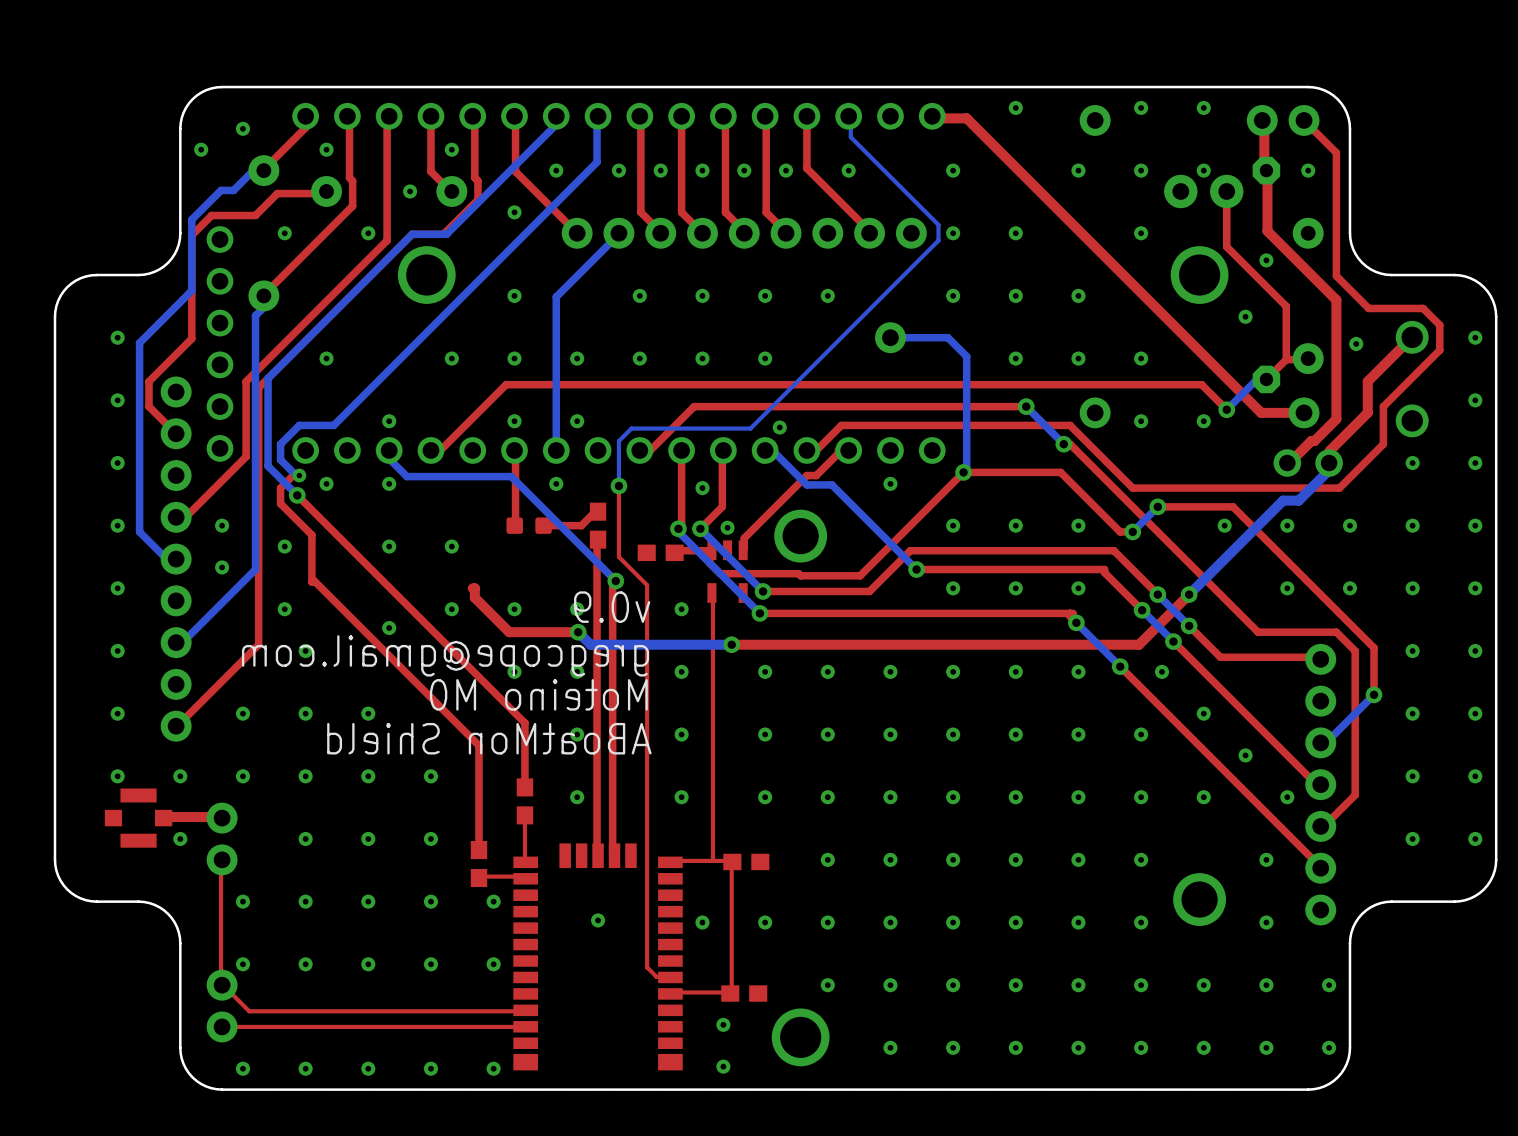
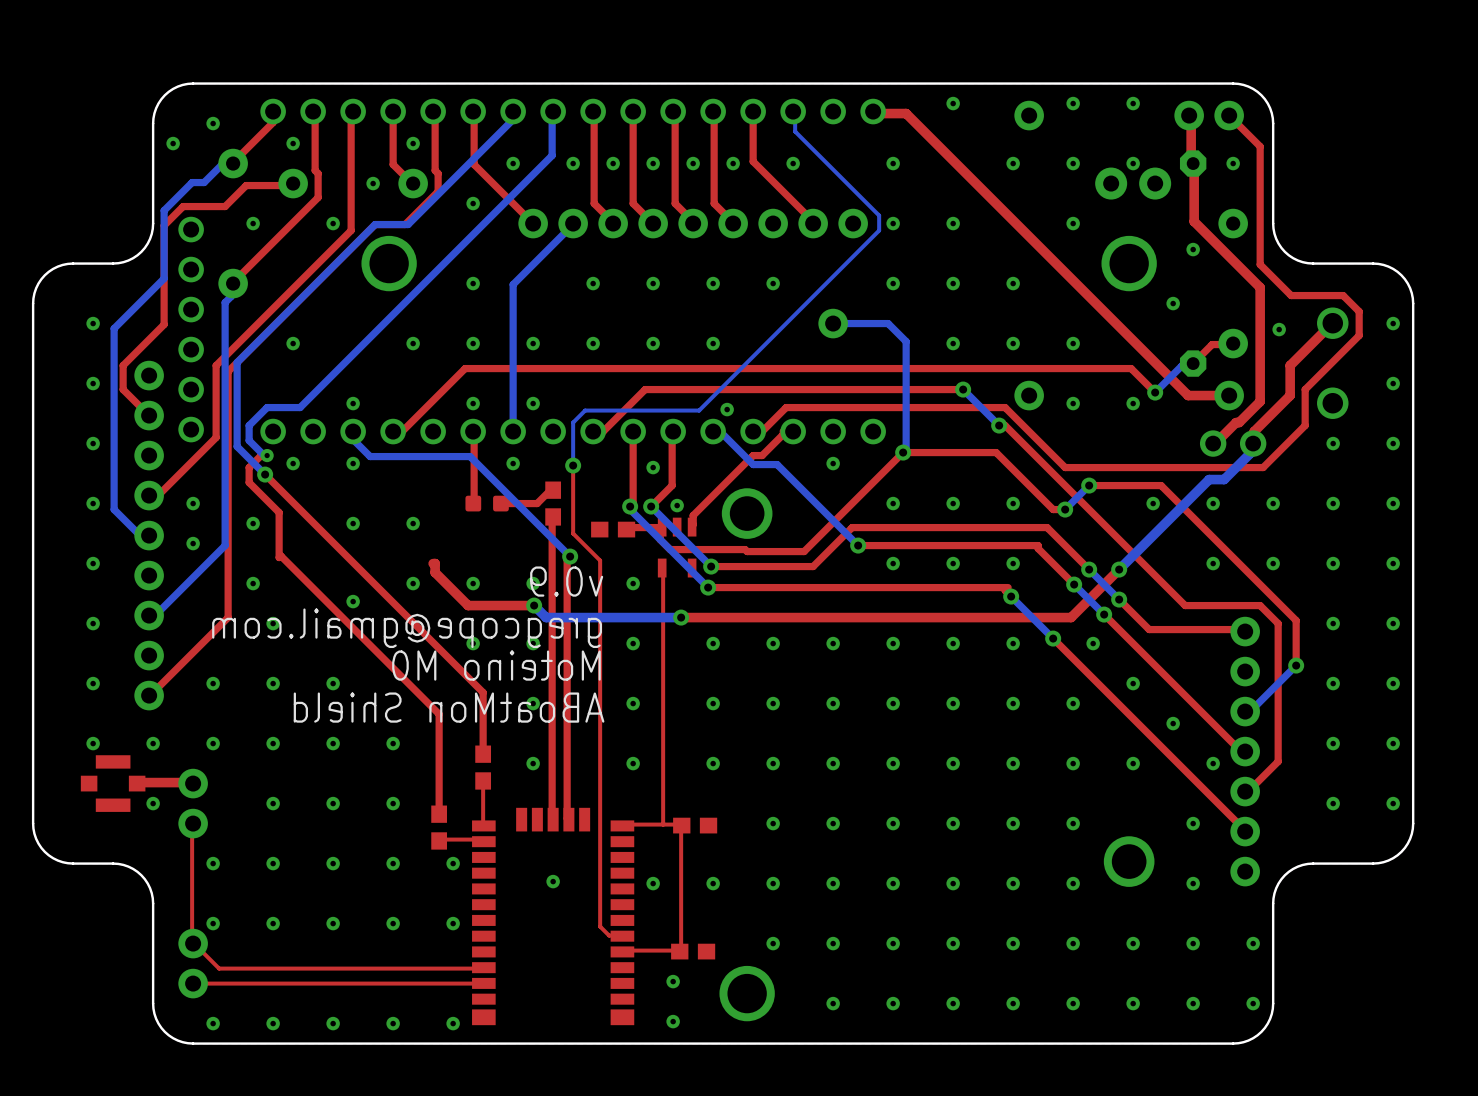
top track: (1226, 191) (1226, 246) (1286, 306) (1286, 359) -> none

